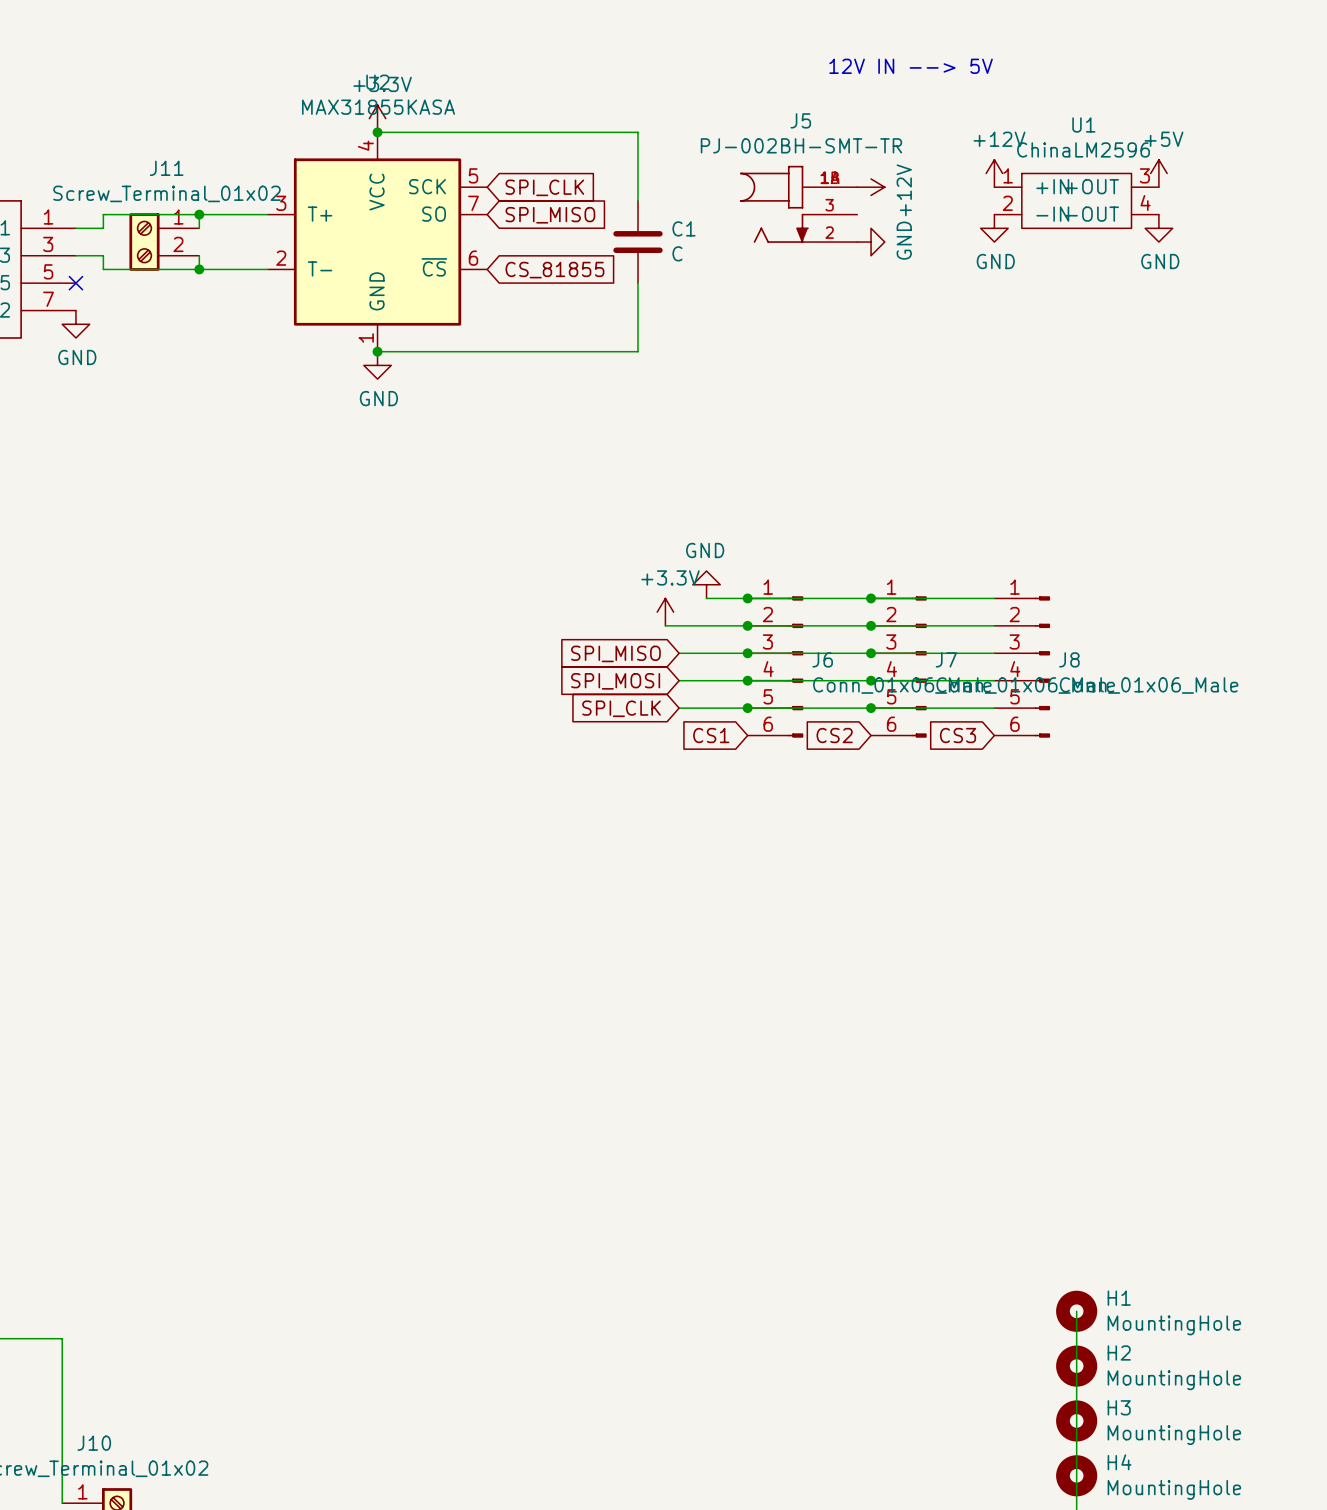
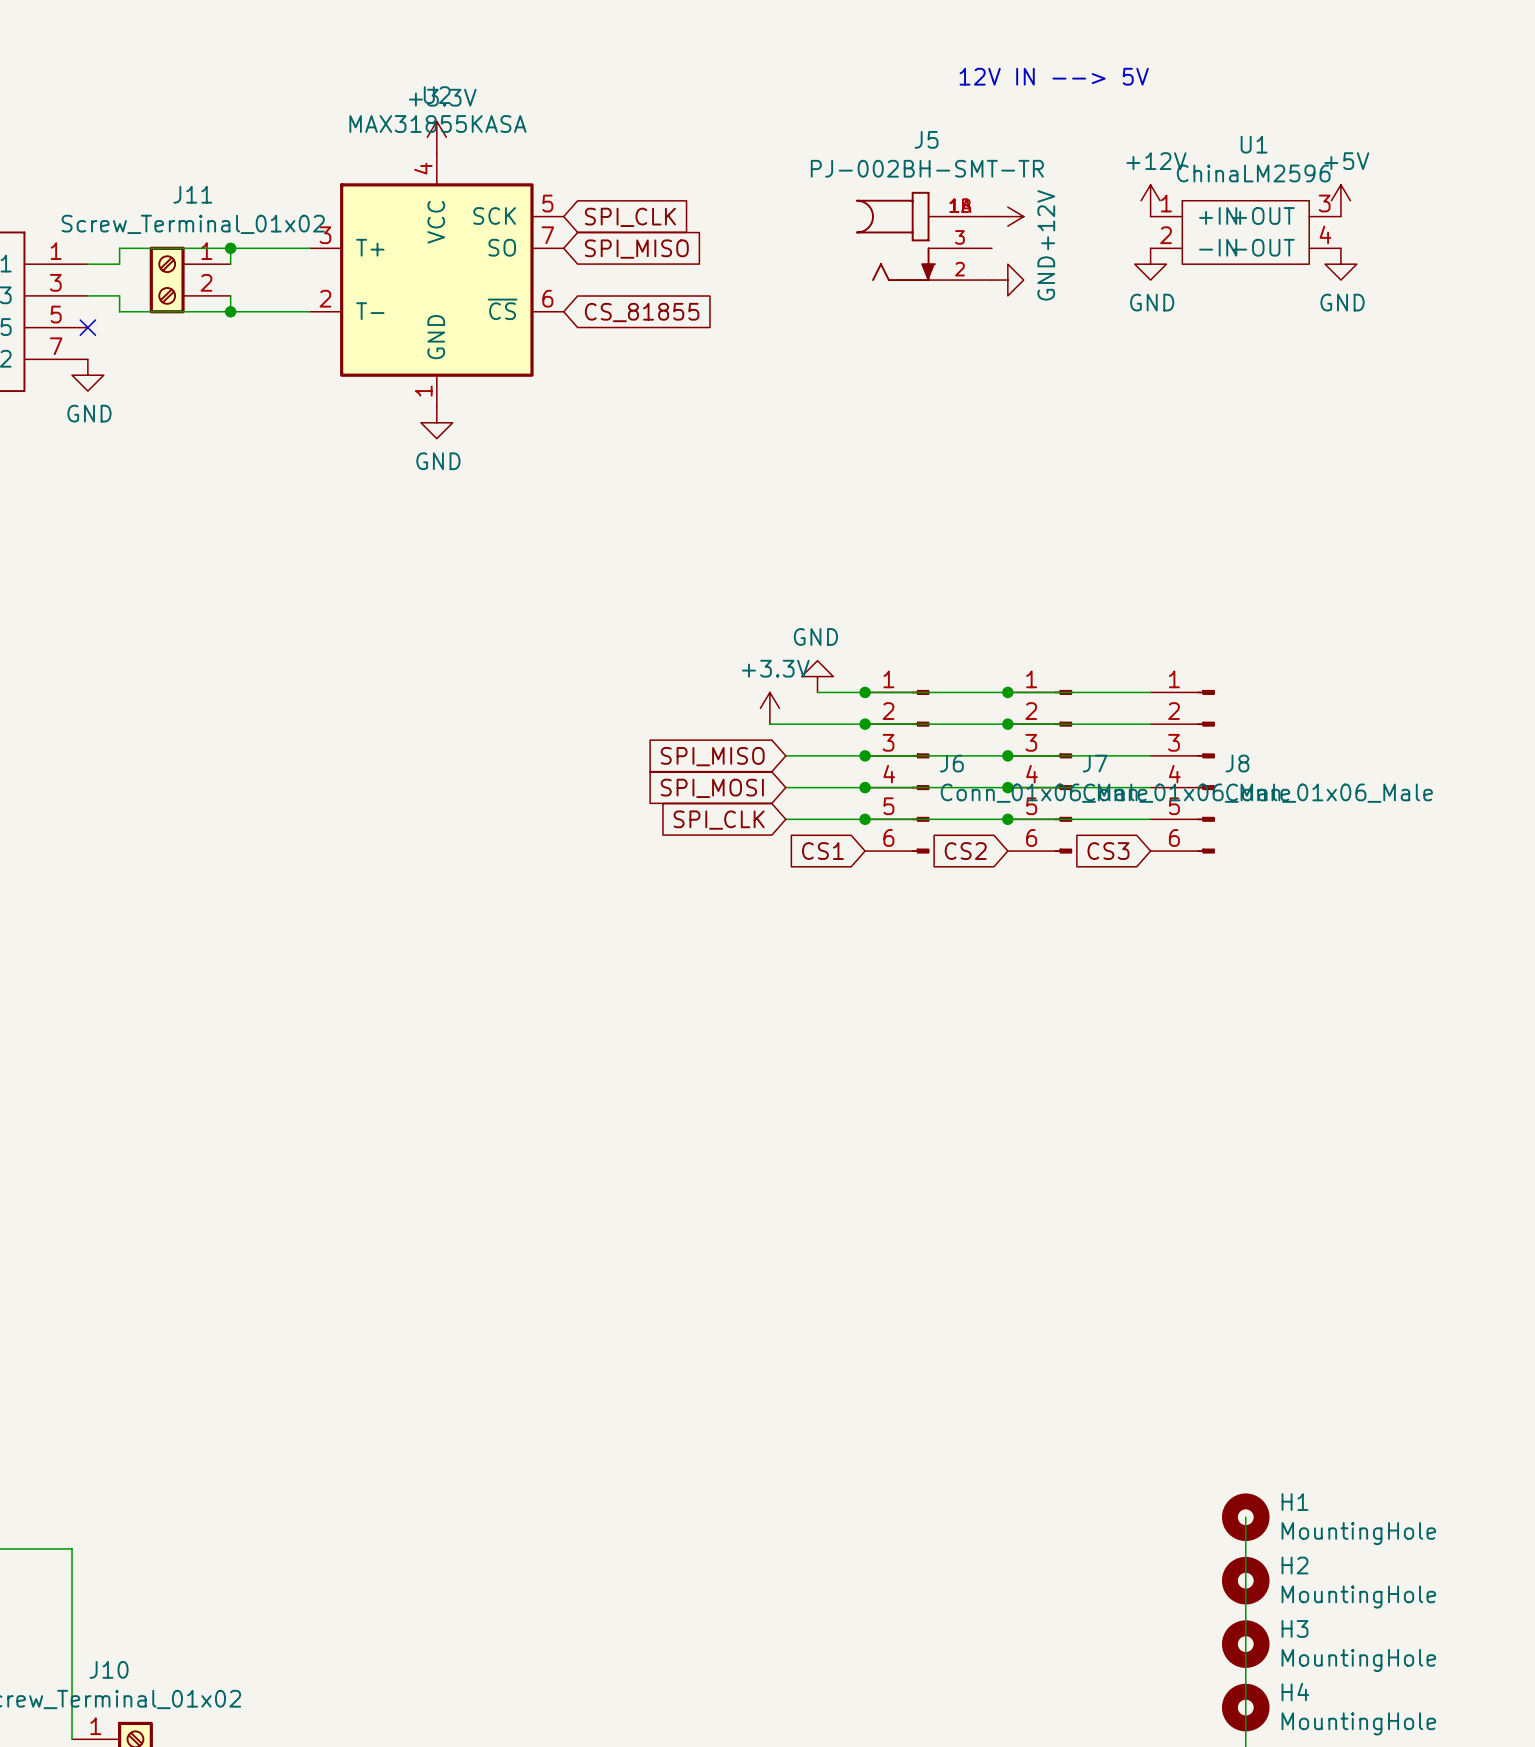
wire: (377, 132) (637, 132) (637, 200) -> none
junction: (377, 132) -> none
C1: C (637, 242) -> none
wire: (637, 283) (637, 351) (377, 351) -> none
junction: (377, 351) -> none

